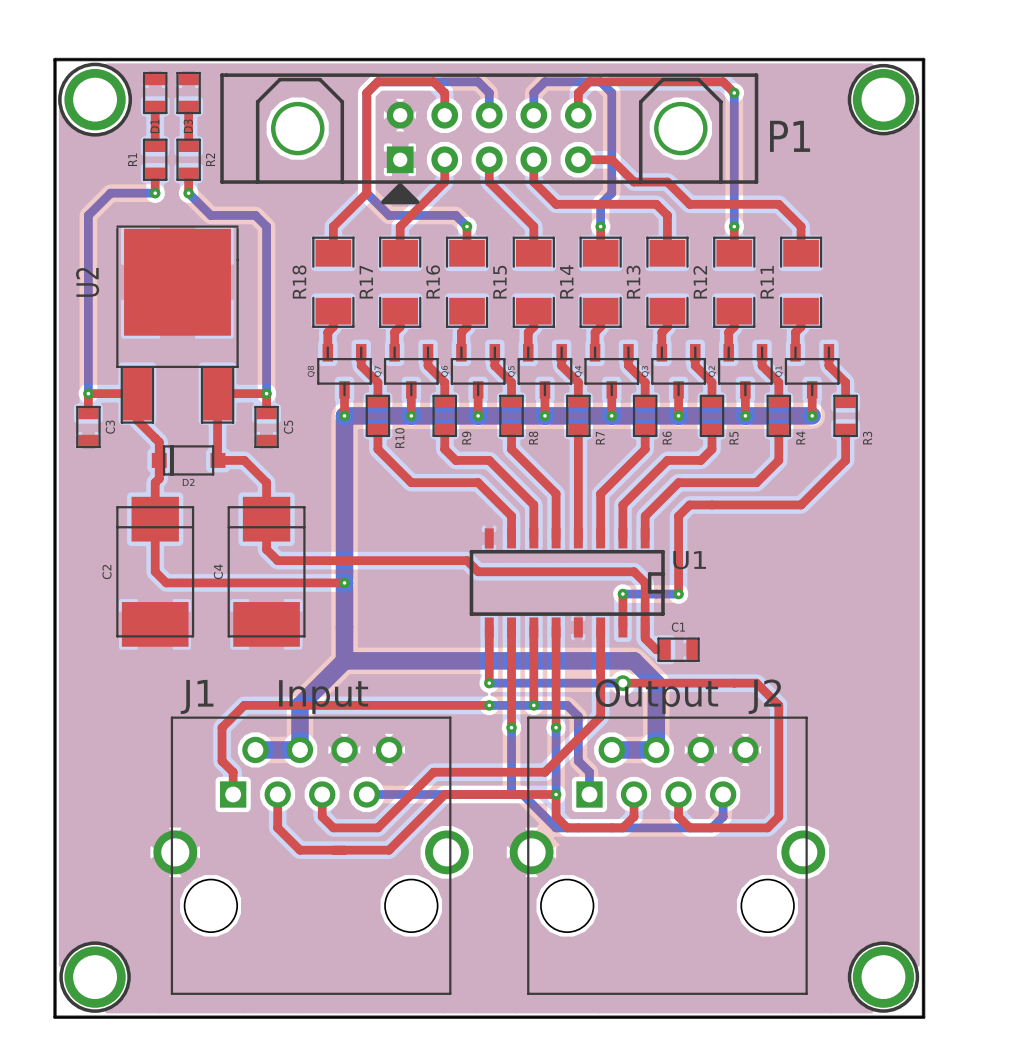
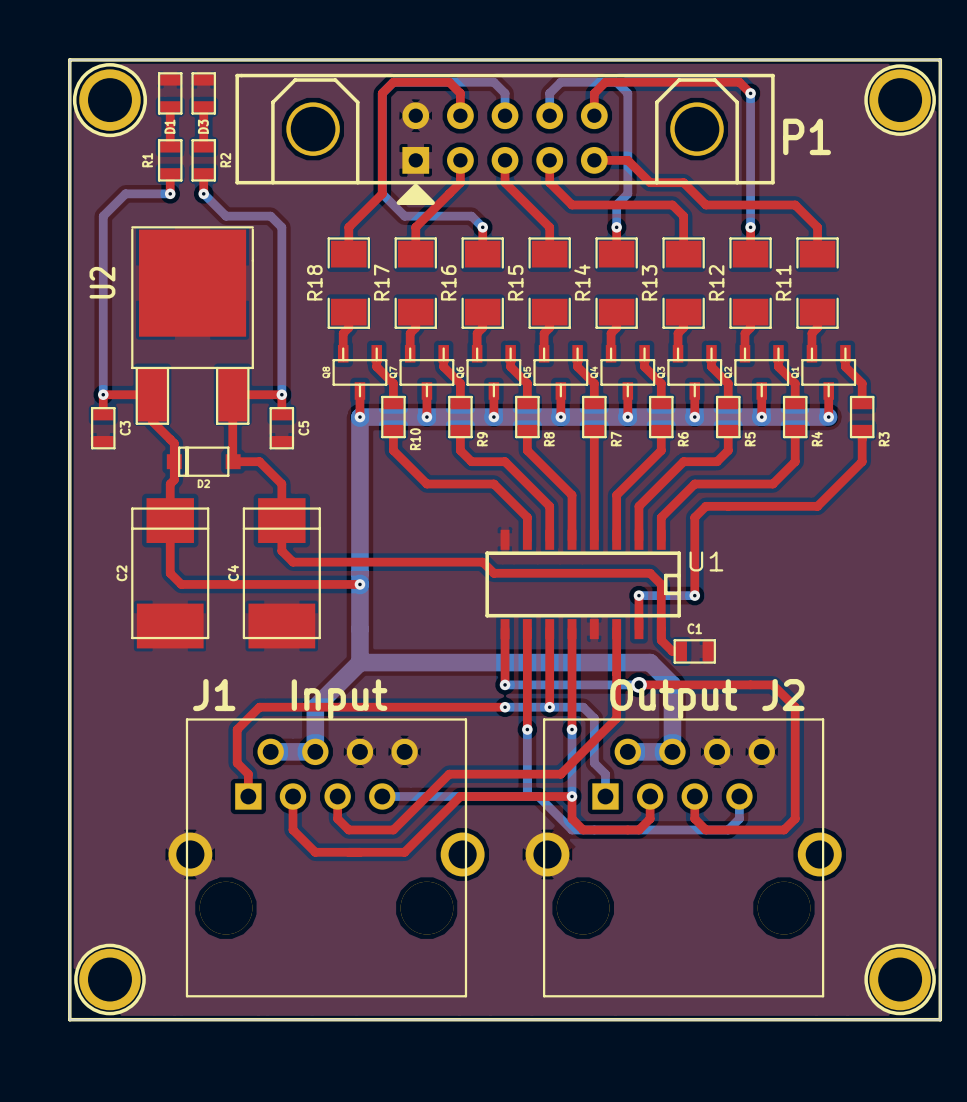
J1 footprint: [153, 716, 469, 995] -> [168, 718, 485, 998]
J2 footprint: [509, 716, 826, 995] -> [525, 718, 842, 998]

